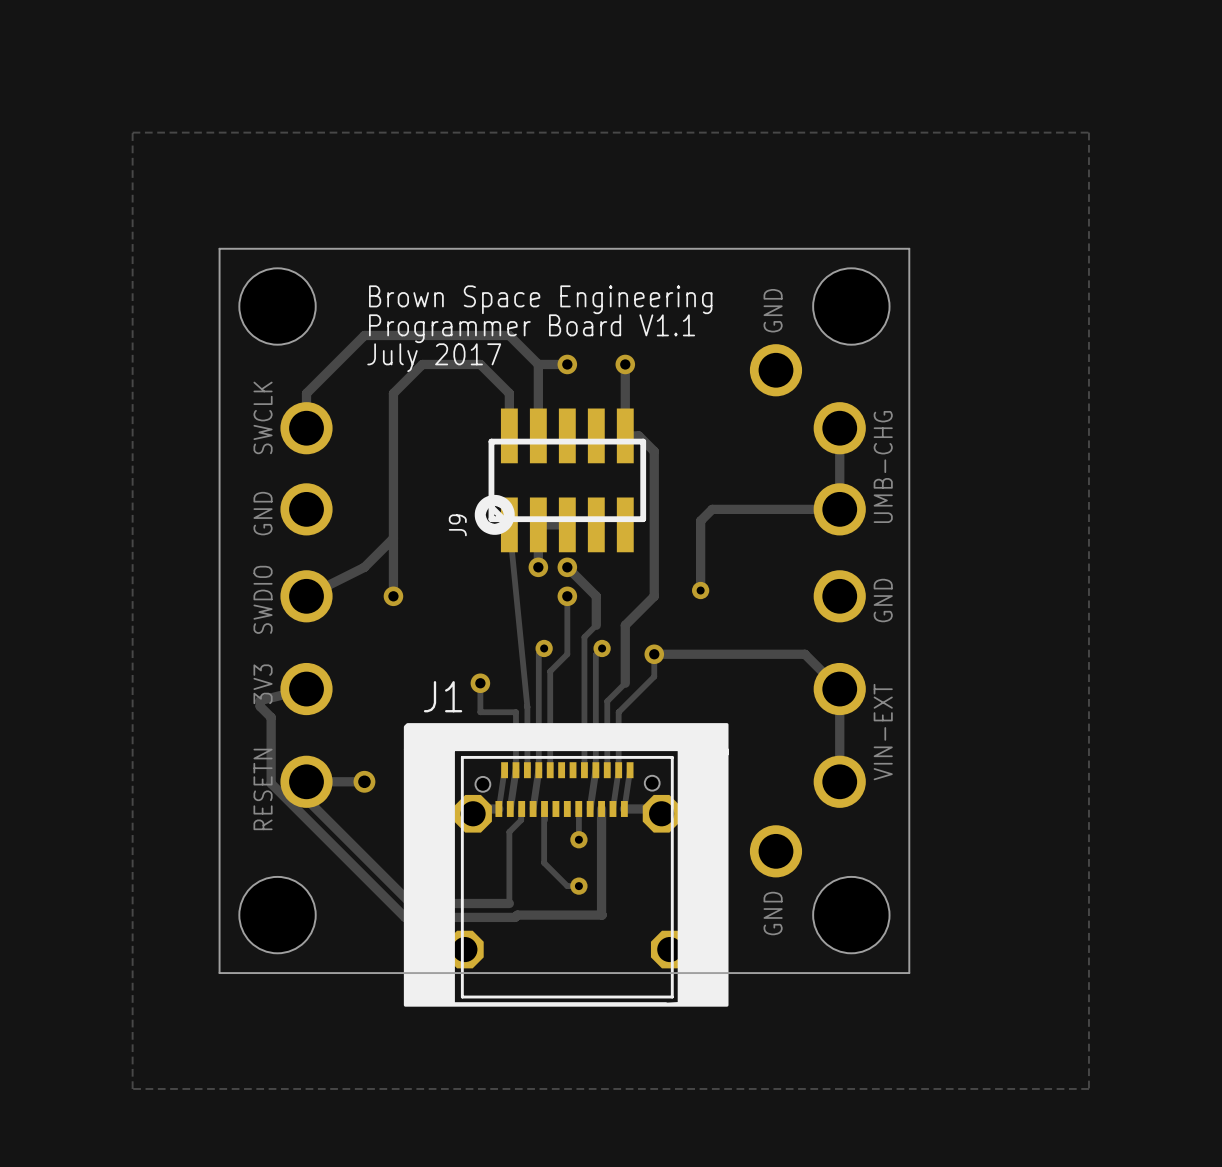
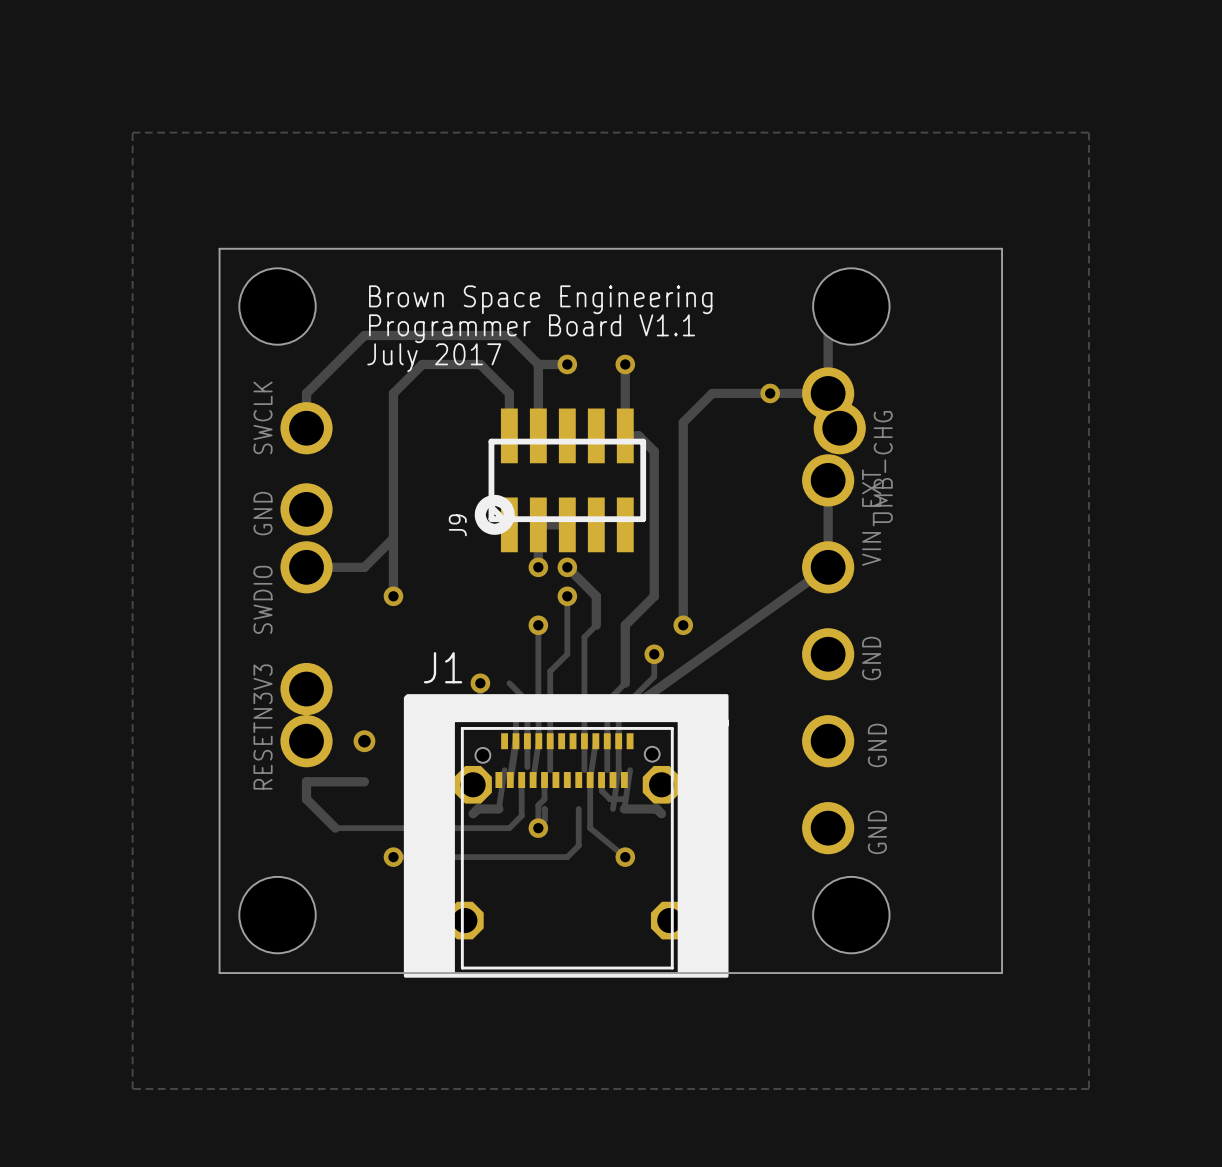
board edge: (909, 248) (909, 973) -> (909, 248) (1002, 248) (1002, 973) (909, 973)
track: none -> (828, 306) (828, 393) (712, 393) (683, 422) (683, 625)
part: GND (775, 370) -> none
via: none -> (770, 393)
part: none -> (828, 393)
track: (839, 428) (839, 509) (712, 509) (700, 520) (700, 590) -> none
track: none -> (828, 480) (828, 567) (625, 712) (618, 712)
part position: (839, 509) -> (828, 480)
track: (509, 524) (526, 706) -> (509, 683) (527, 701) (527, 707)
track: (364, 567) (306, 596) -> (364, 567) (306, 567)
via: (700, 590) -> none
part position: (306, 596) -> (306, 567)
part position: (839, 596) -> (828, 654)
track: none -> (538, 625) (538, 741) (533, 780)
via: none -> (538, 625)
via: none -> (683, 625)
track: (544, 648) (538, 653) (538, 770) (533, 808) -> none
via: (544, 648) -> none
track: (602, 648) (595, 654) (595, 770) (590, 808) -> none
via: (602, 648) -> none
track: (654, 654) (804, 654) (839, 689) (839, 781) -> none
track: (306, 689) (260, 700) (260, 706) (271, 717) (271, 783) (405, 917) (602, 915) (601, 808) -> none
part: (839, 689) -> none
track: (515, 741) (515, 770) (510, 808) -> (515, 741) (510, 780)
track: none -> (595, 741) (590, 780) (590, 828) (625, 857)
part: none -> GND (828, 741)
track: none -> (544, 780) (544, 799) (538, 805) (538, 828)
track: none -> (601, 780) (602, 791) (610, 799) (625, 799)
part position: (306, 781) -> (306, 741)
via position: (364, 781) -> (364, 741)
part position: (839, 781) -> (828, 567)
track: (521, 808) (521, 820) (509, 831) (509, 903) (410, 903) (335, 828) -> (521, 780) (521, 815) (509, 828) (335, 828)
track: (578, 810) (578, 839) -> (578, 810) (578, 845) (567, 857) (393, 857)
track: (544, 812) (544, 862) (567, 886) (578, 886) -> none
via: none -> (538, 828)
via: (578, 839) -> none
part position: (775, 851) -> (828, 828)
via: none -> (393, 857)
via: none -> (625, 857)
J1 position: (566, 864) -> (566, 835)
via: (578, 886) -> none
part value position: GND (773, 913) -> GND (877, 832)

